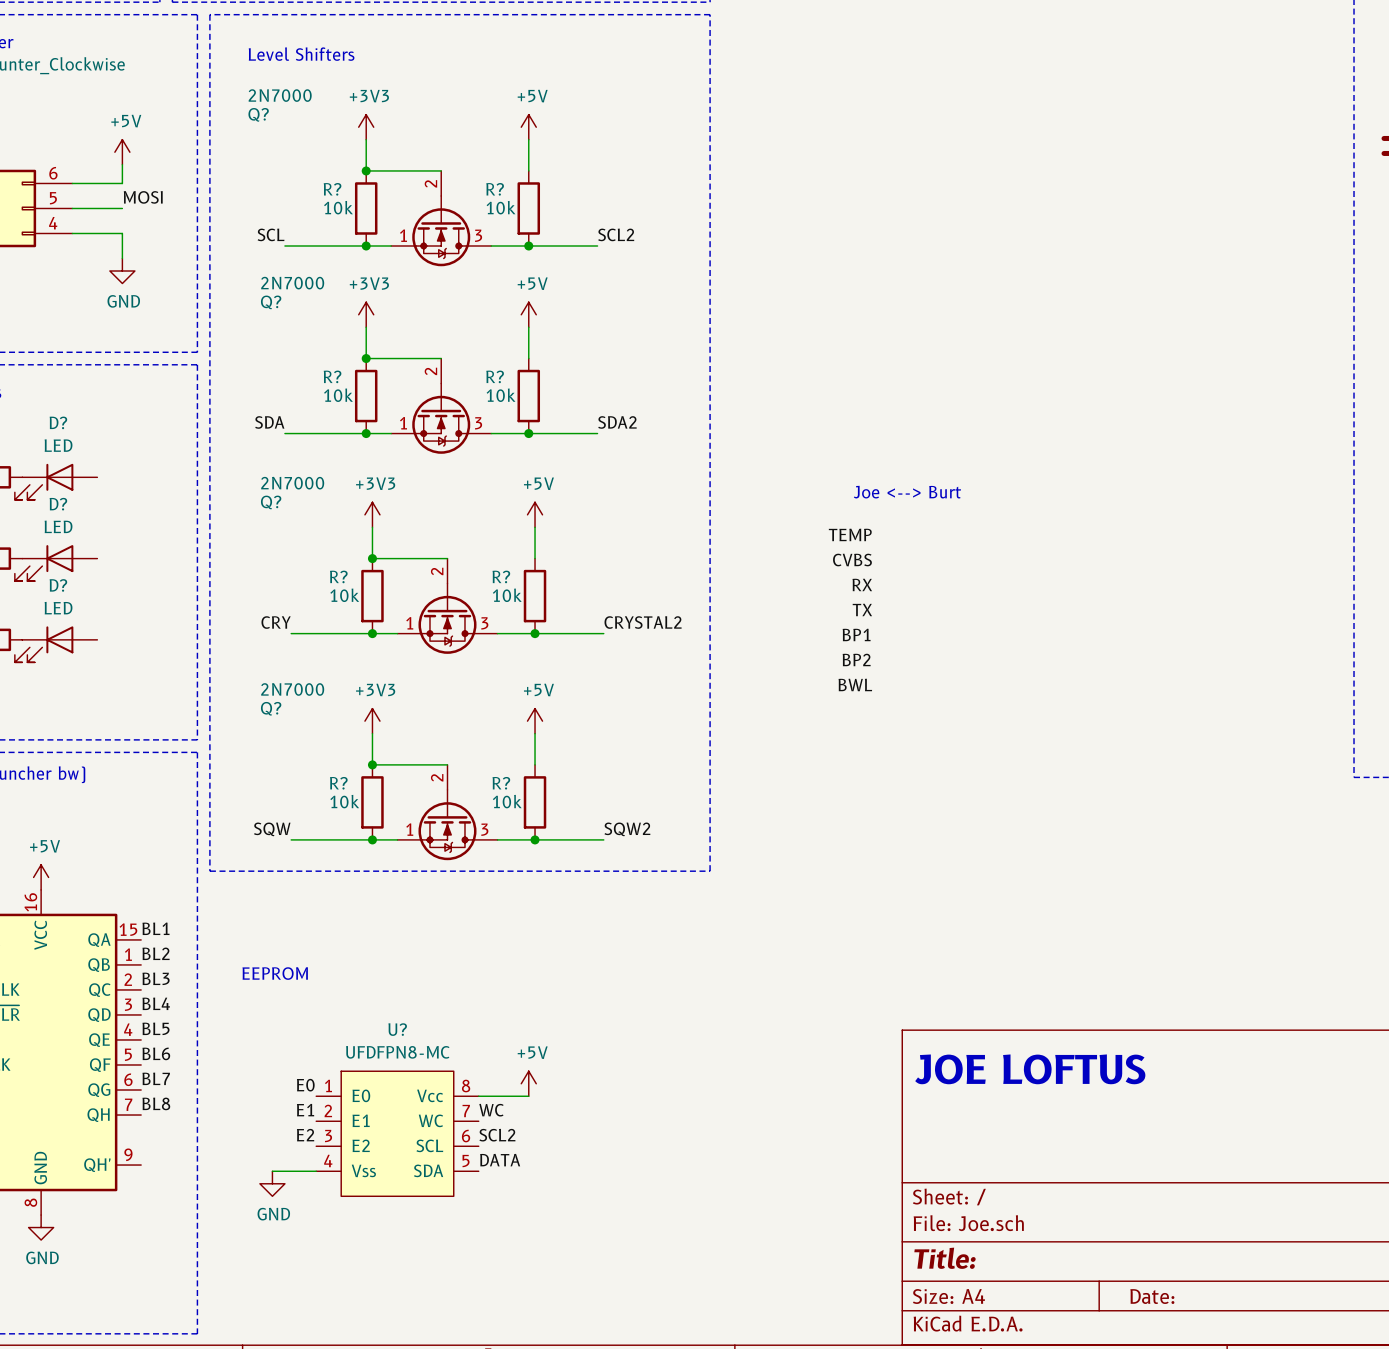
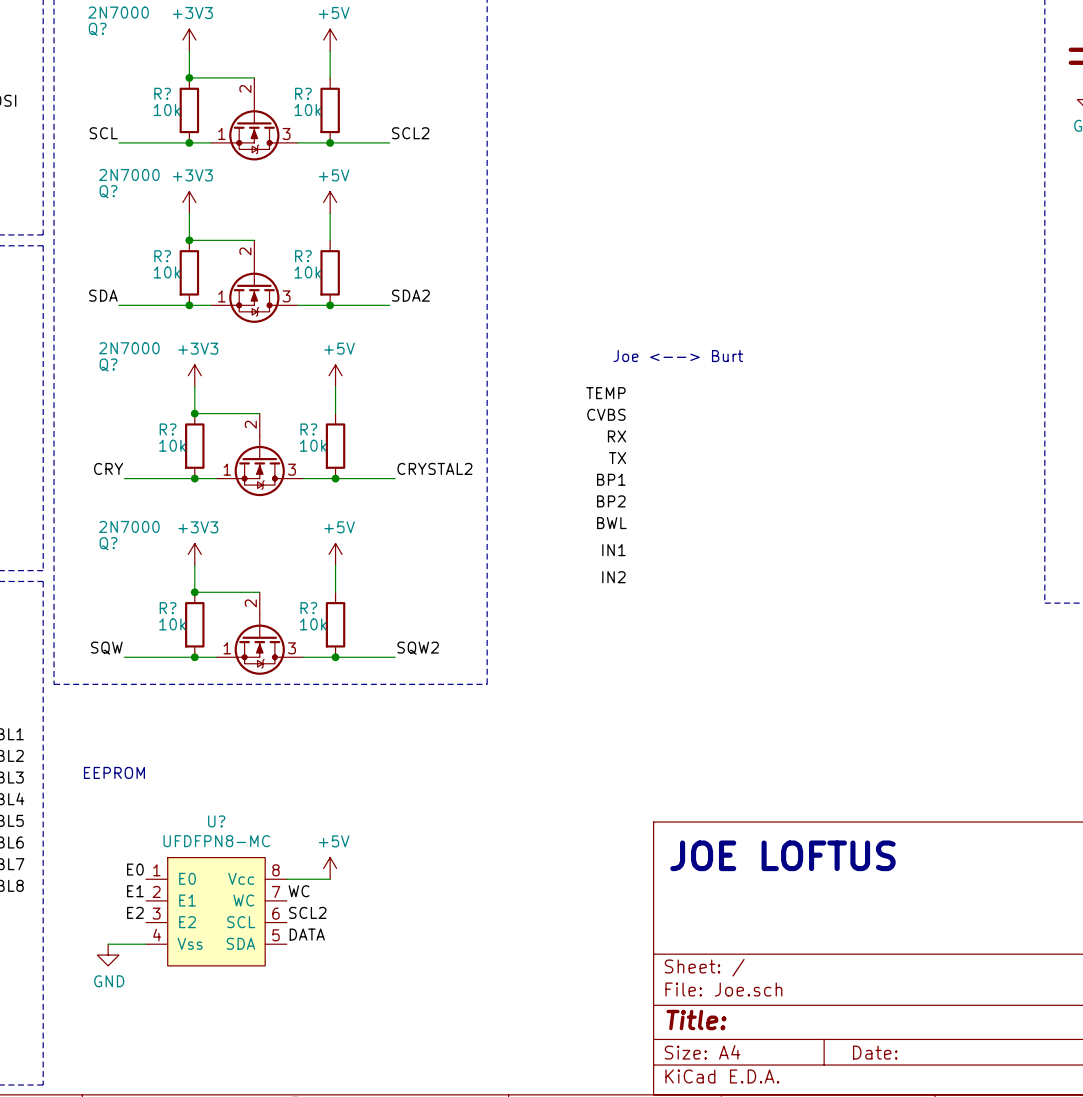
label: none -> IN1 (613, 550)
label: none -> IN2 (613, 577)

